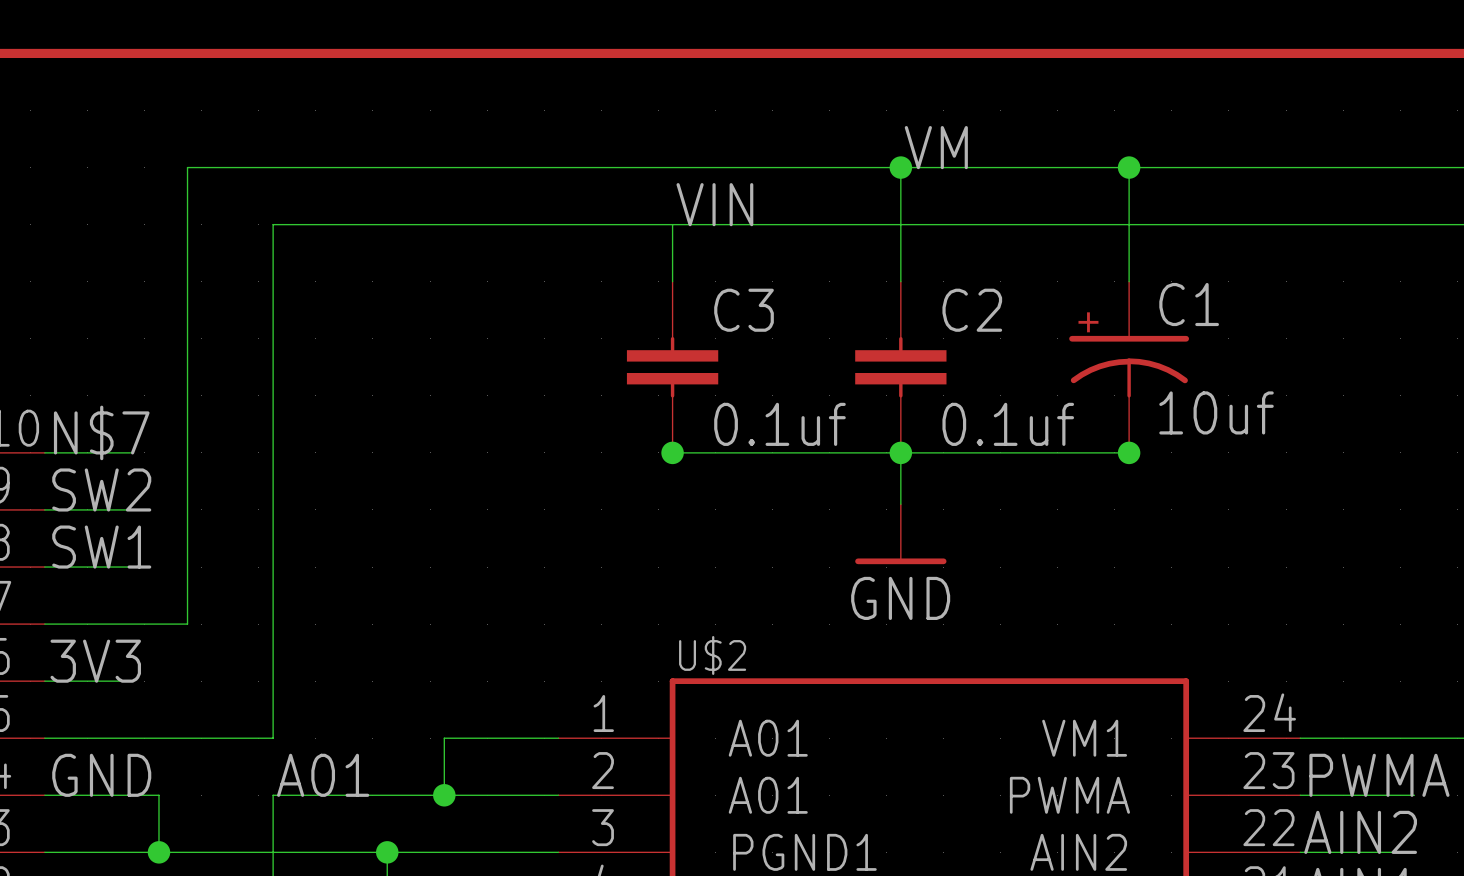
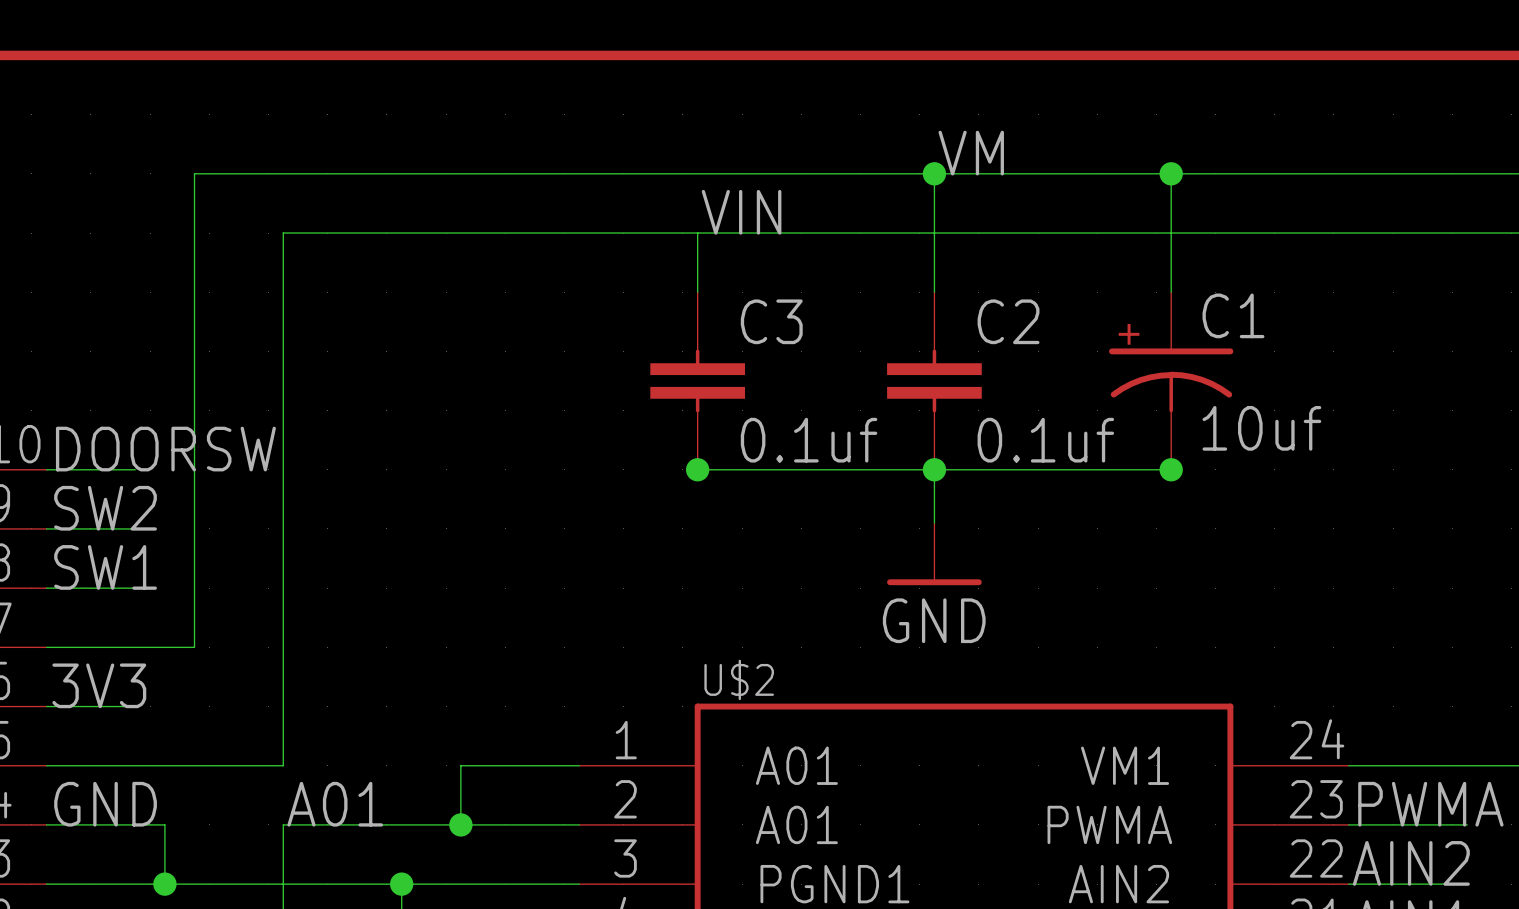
label: N$7 (101, 432) -> DOORSW (165, 449)

